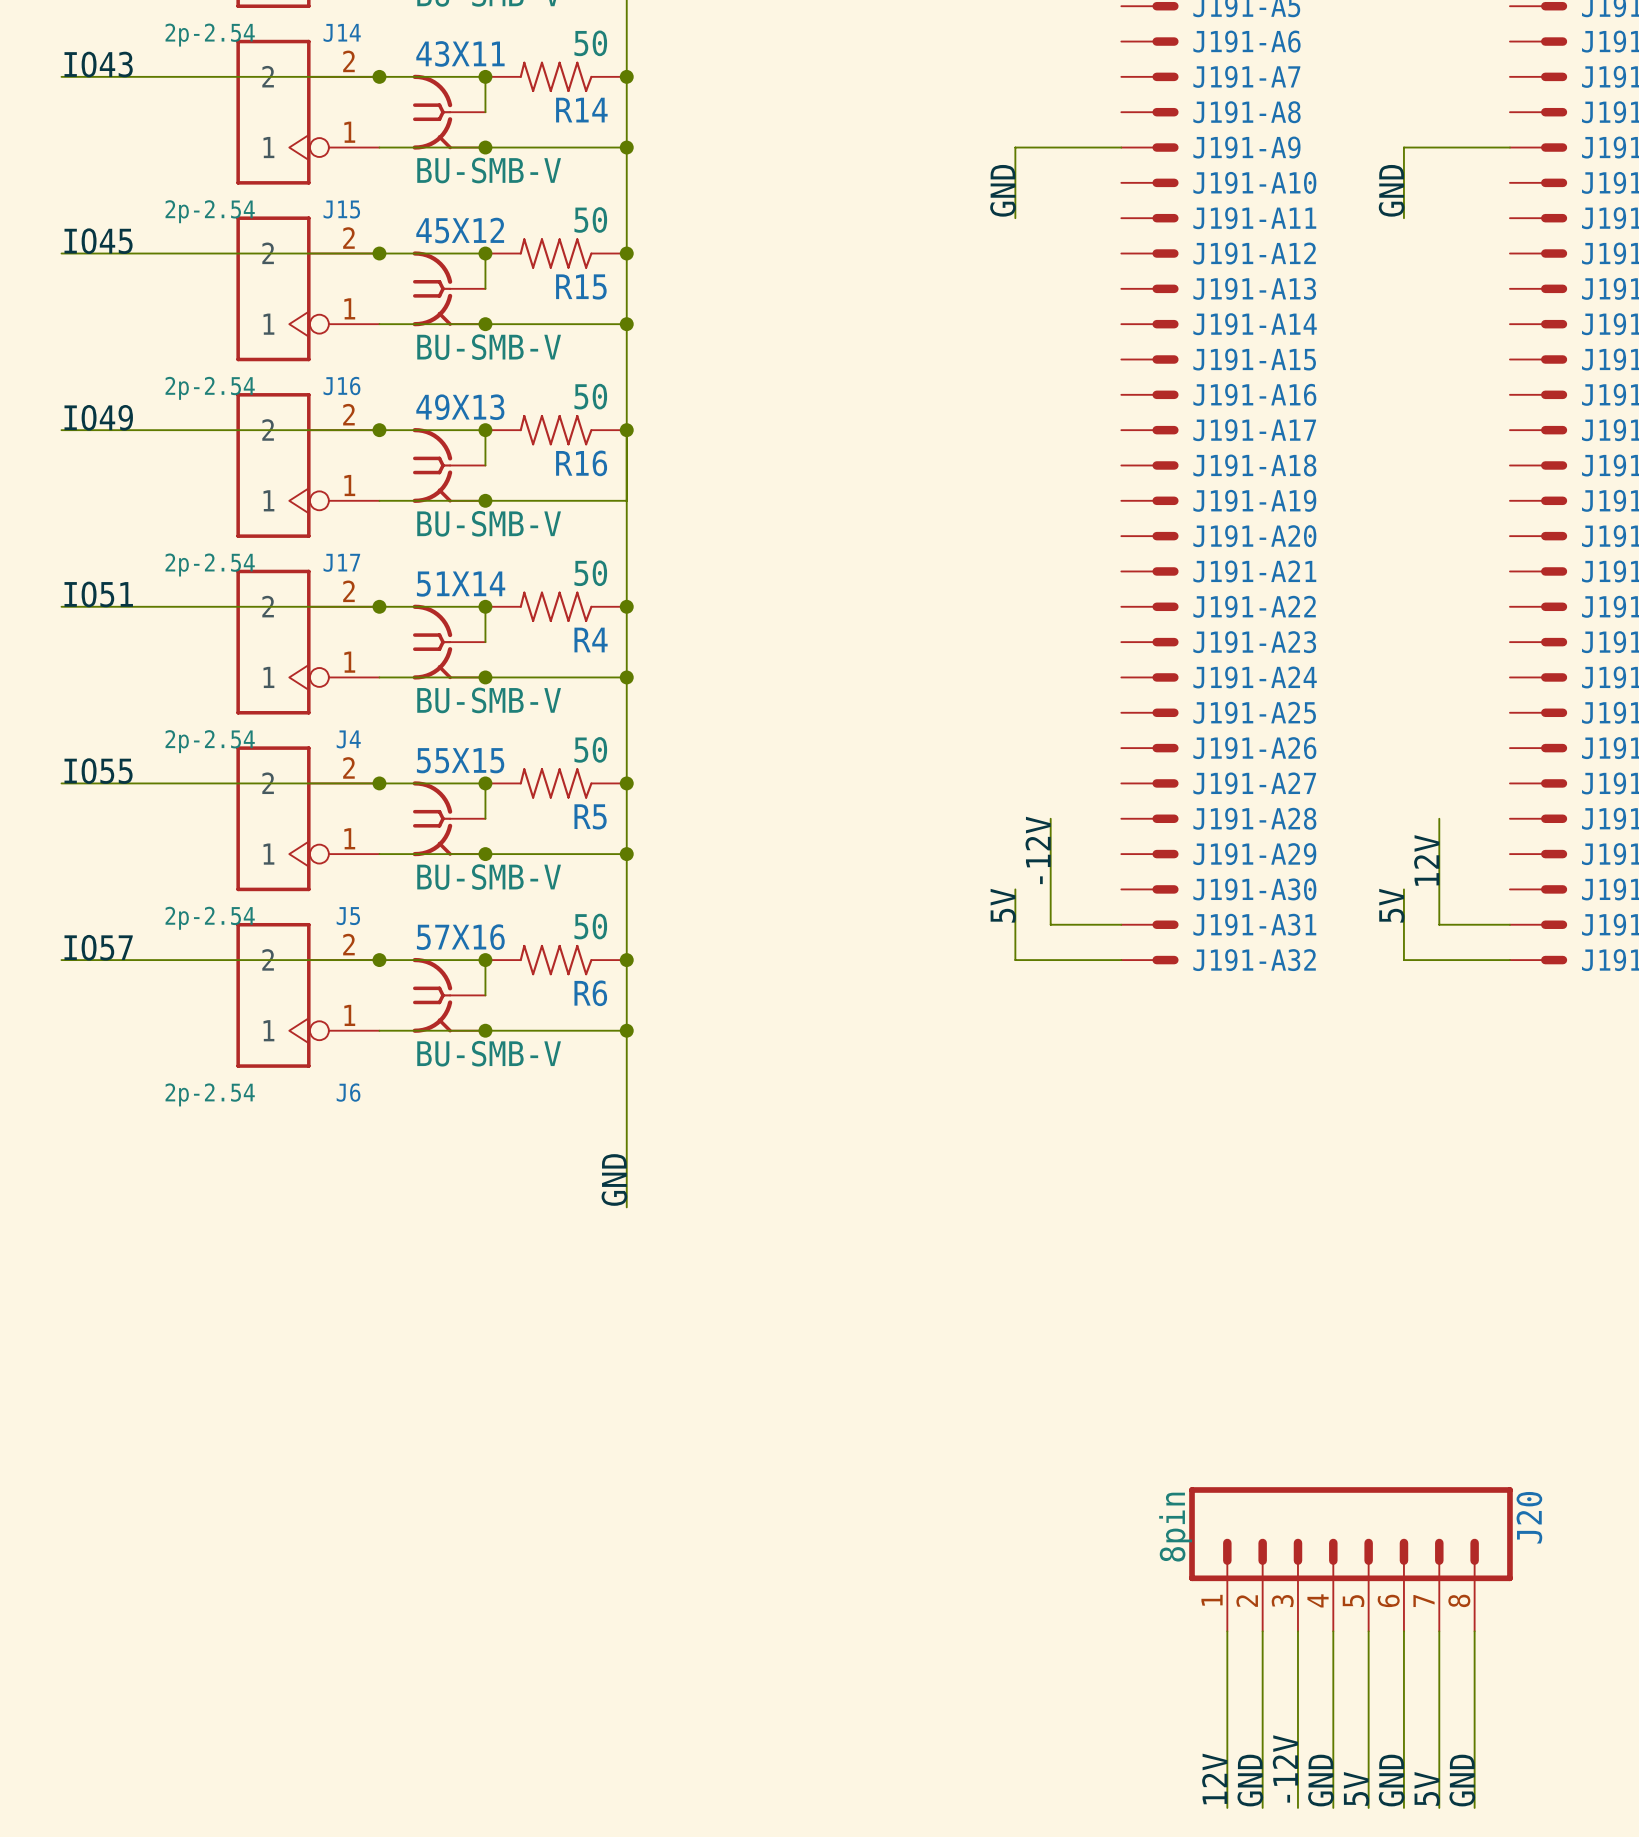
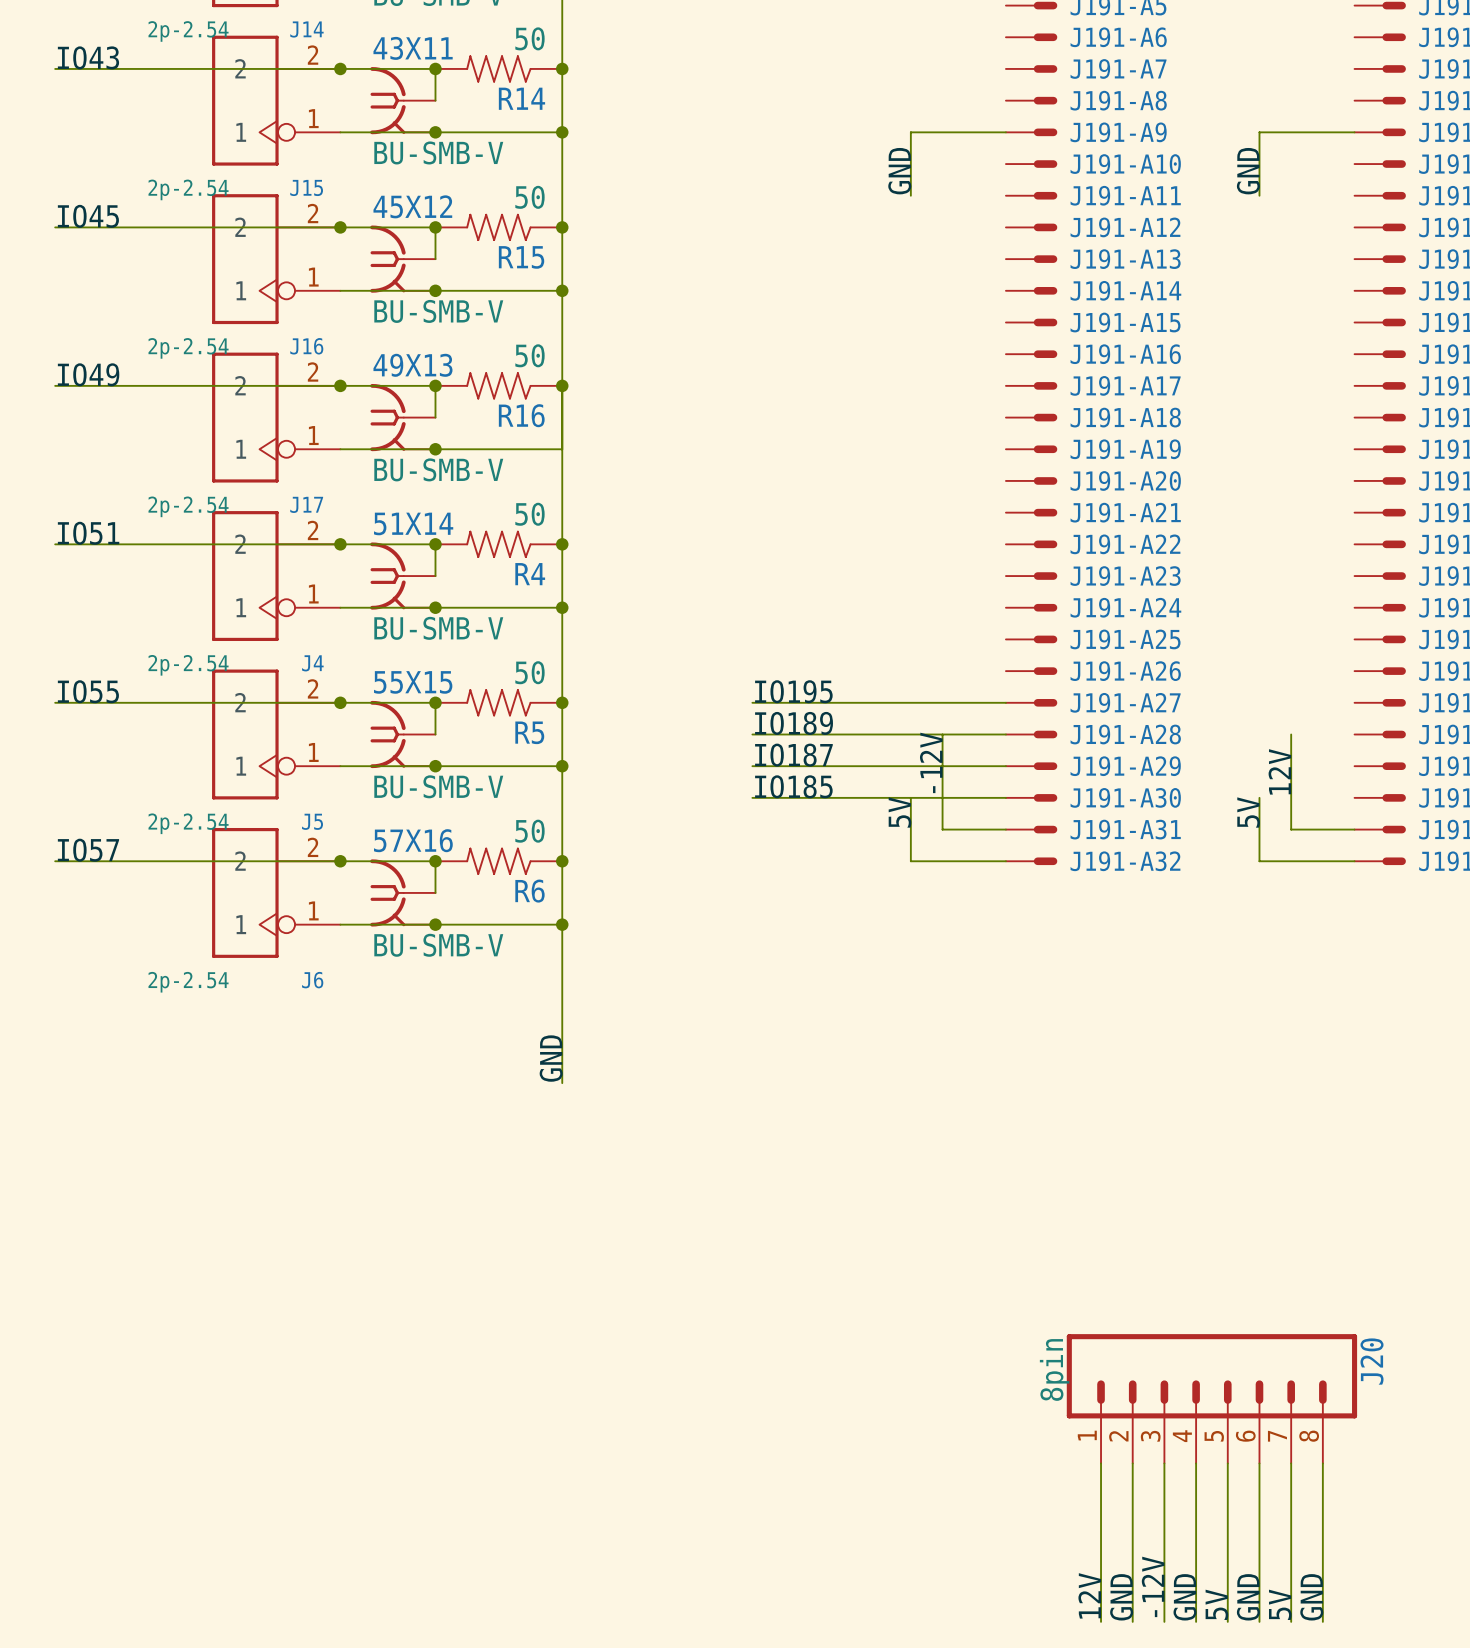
label: none -> IO195 (793, 691)
wire: none -> (752, 702) (1005, 702)
label: none -> IO189 (794, 723)
wire: none -> (752, 734) (1005, 734)
label: none -> IO187 (793, 755)
wire: none -> (752, 766) (1005, 766)
label: none -> IO185 (793, 786)
wire: none -> (752, 797) (1005, 797)

